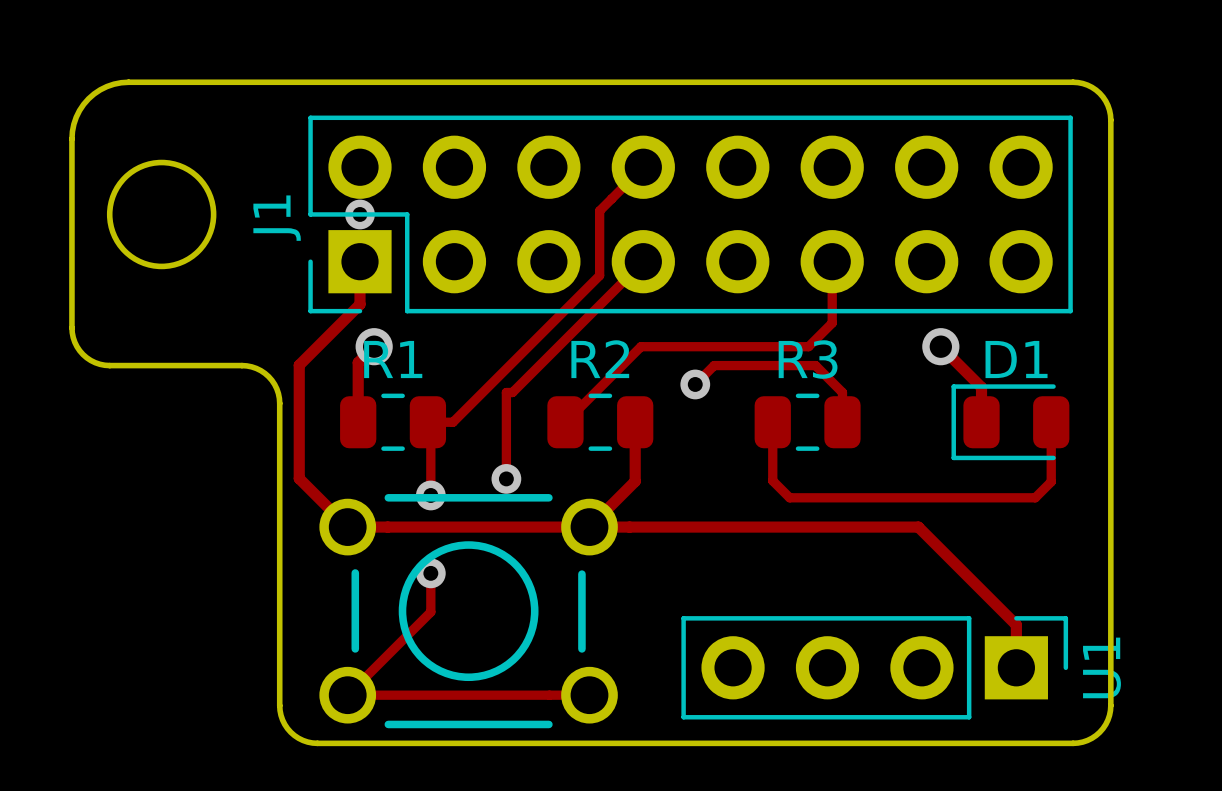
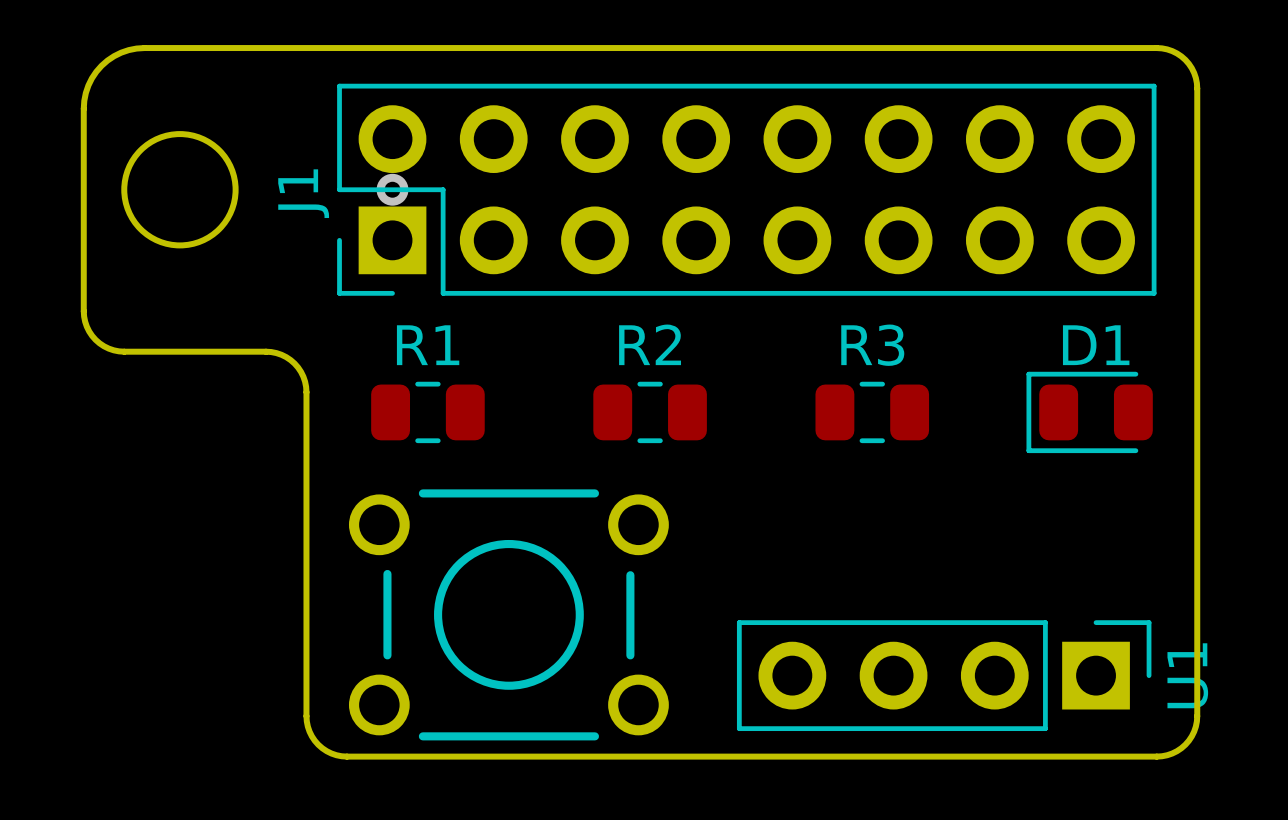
track: (643, 167) (599, 210) (599, 275) (452, 422) (427, 422) (430, 425) (430, 495) -> none
track: (360, 261) (360, 304) (299, 365) (299, 478) (347, 527) (918, 527) (1016, 625) (1016, 667) -> none
track: (643, 261) (512, 392) (506, 392) (506, 478) -> none
track: (832, 261) (832, 323) (808, 346) (641, 346) (565, 422) -> none
track: (374, 346) (358, 362) (358, 422) -> none
via: (374, 346) -> none
track: (940, 346) (981, 387) (981, 422) -> none
via: (940, 346) -> none
track: (695, 384) (714, 365) (815, 365) (842, 392) (842, 422) -> none
via: (695, 384) -> none
track: (635, 422) (635, 481) (589, 527) -> none
track: (772, 422) (772, 480) (789, 497) (1035, 497) (1051, 481) (1051, 422) -> none
via: (506, 478) -> none
via: (430, 495) -> none
track: (430, 573) (430, 612) (347, 695) (589, 695) -> none
via: (430, 573) -> none

